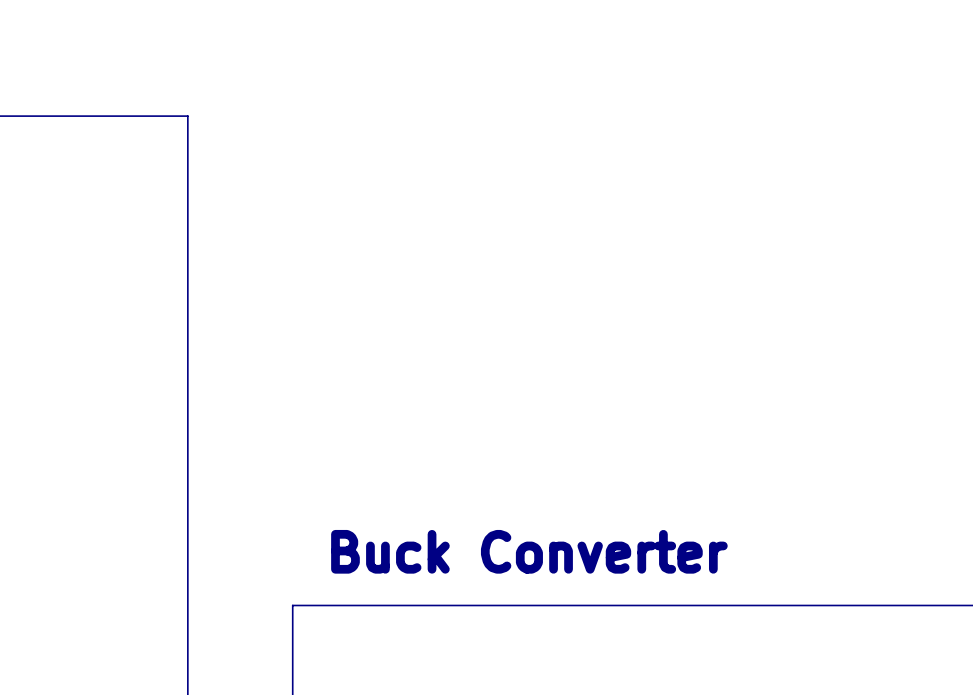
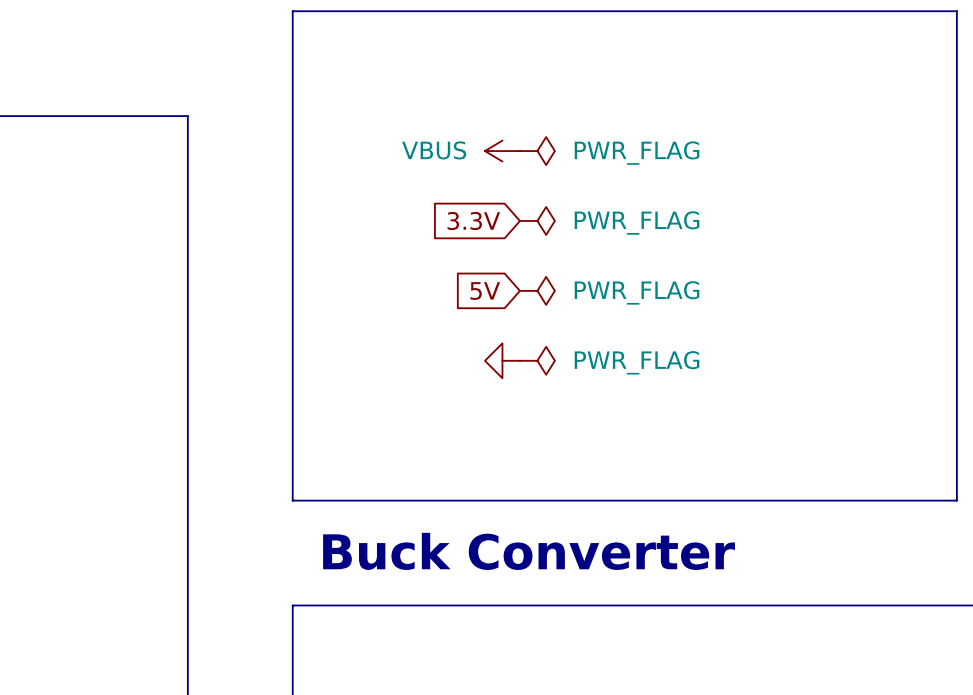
line: none -> (292, 11) (956, 11) (956, 500) (292, 500) (292, 11)
power symbol: none -> VBUS (502, 151)
power symbol: none -> PWR_FLAG (537, 151)
global label: none -> 3.3V (473, 220)
power symbol: none -> PWR_FLAG (537, 220)
global label: none -> 5V (485, 291)
power symbol: none -> PWR_FLAG (537, 290)
power symbol: none -> (502, 360)
power symbol: none -> PWR_FLAG (537, 360)

